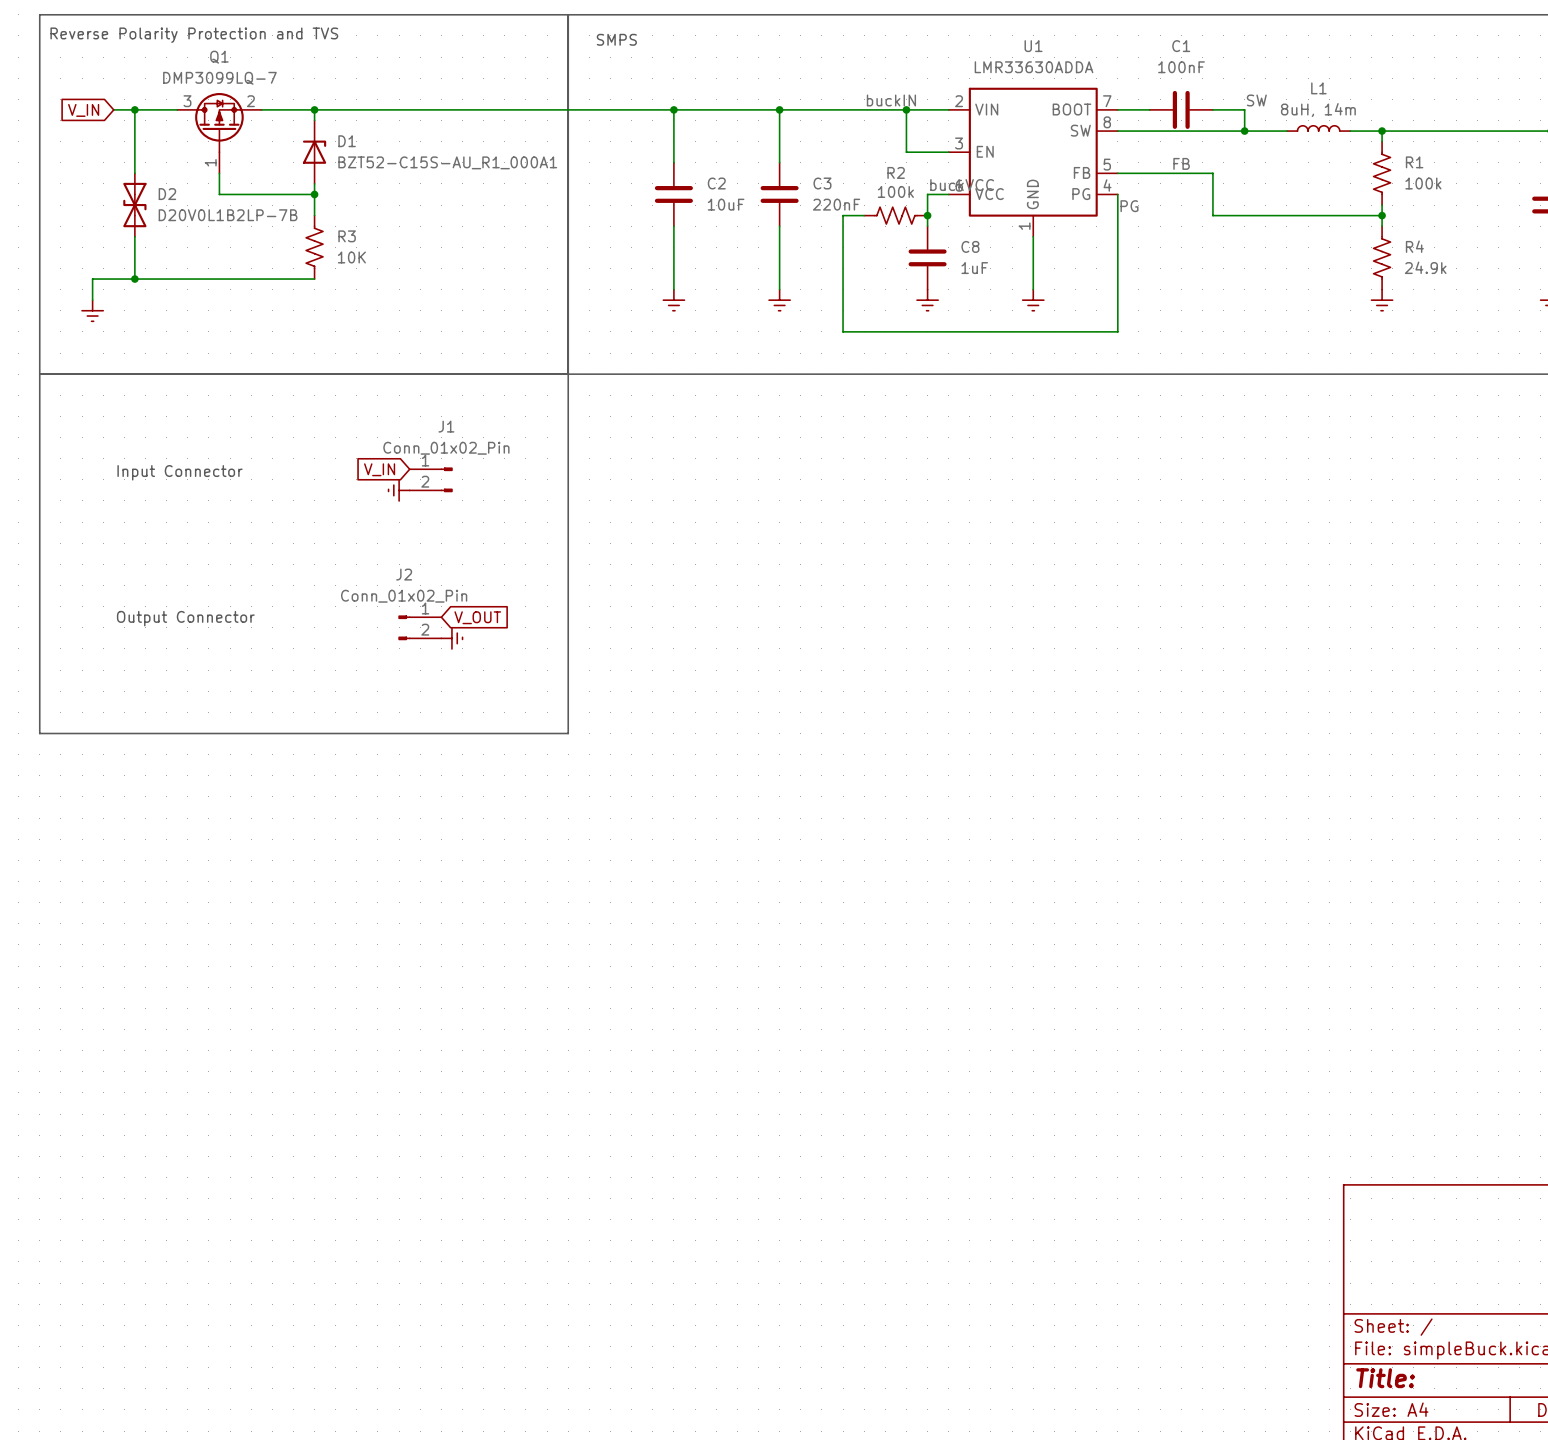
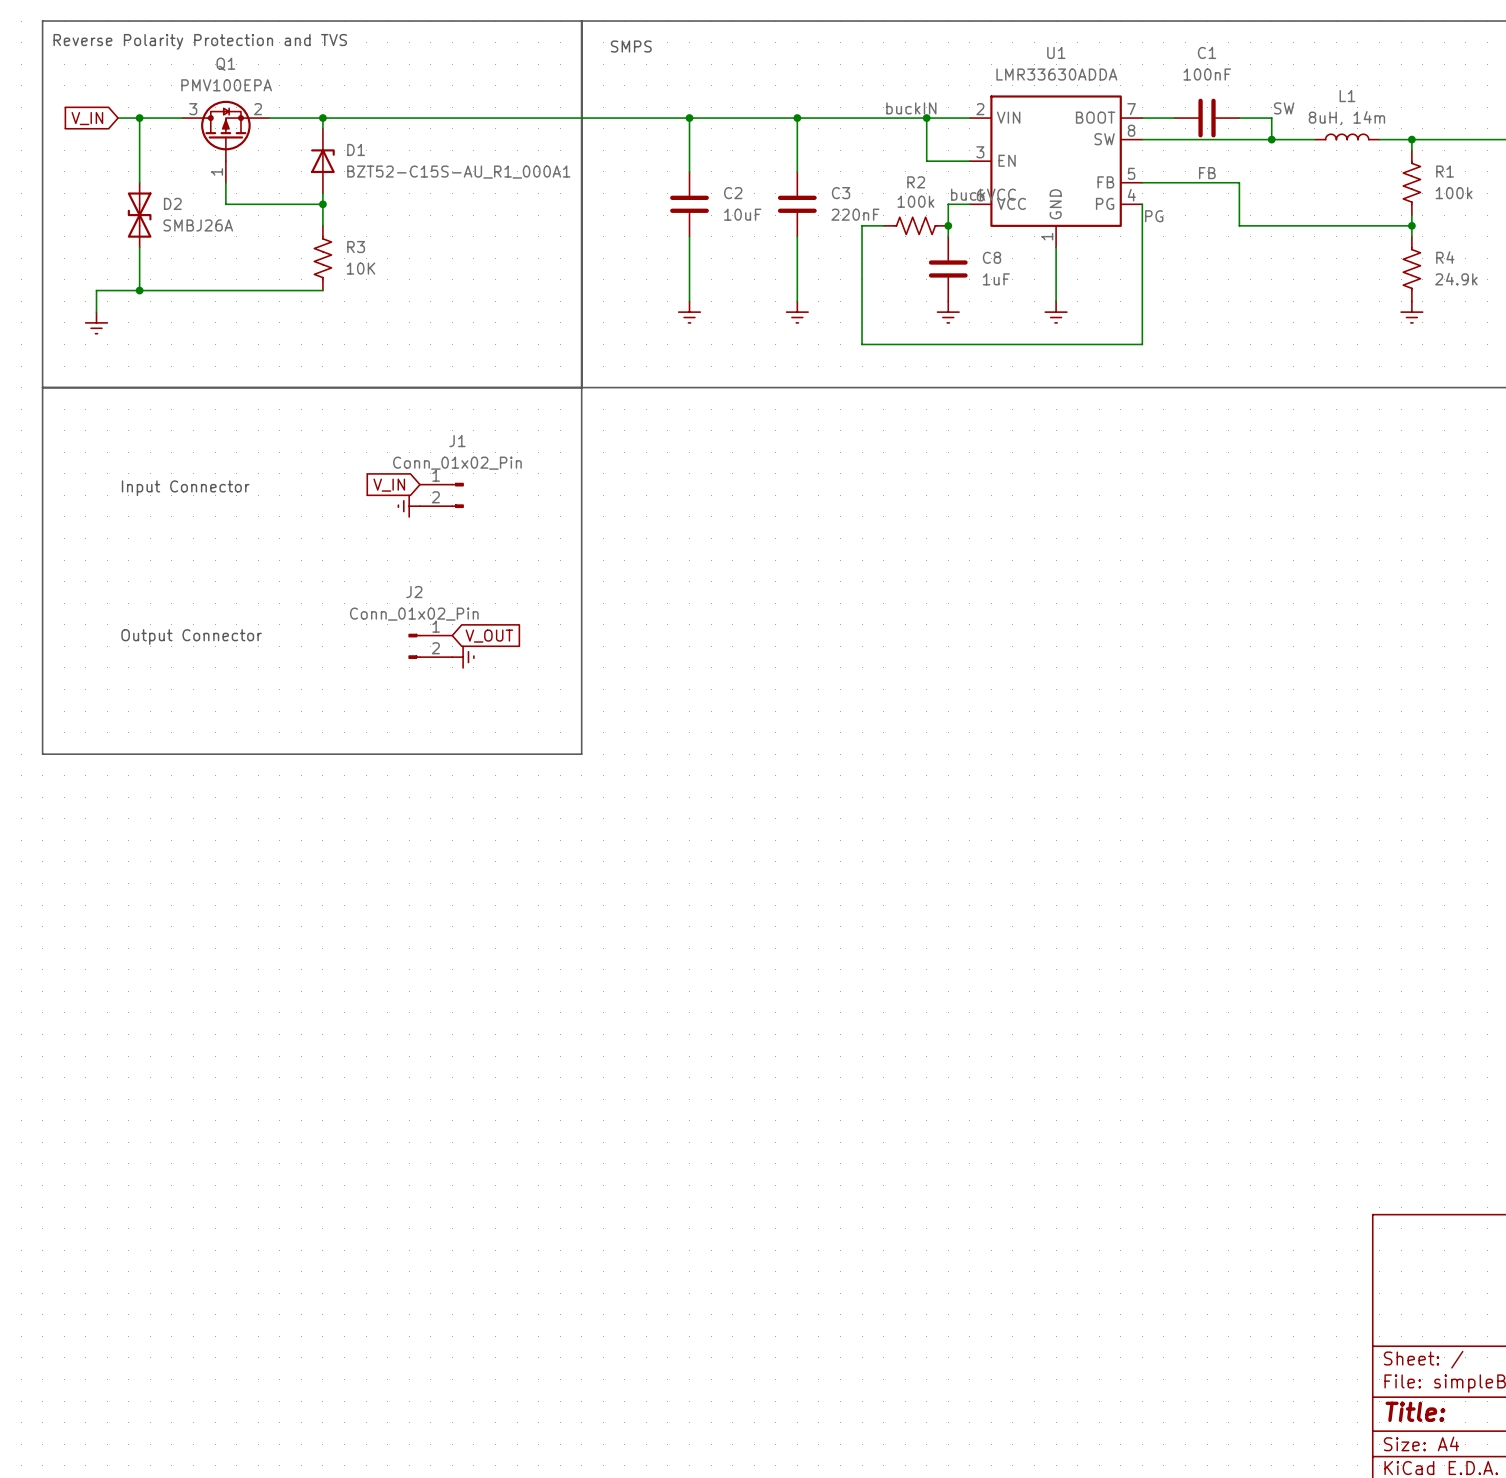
Q1 value: DMP3099LQ-7 (219, 78) -> PMV100EPA (226, 85)
D2 value: D20V0L1B2LP-7B (228, 215) -> SMBJ26A (198, 225)

